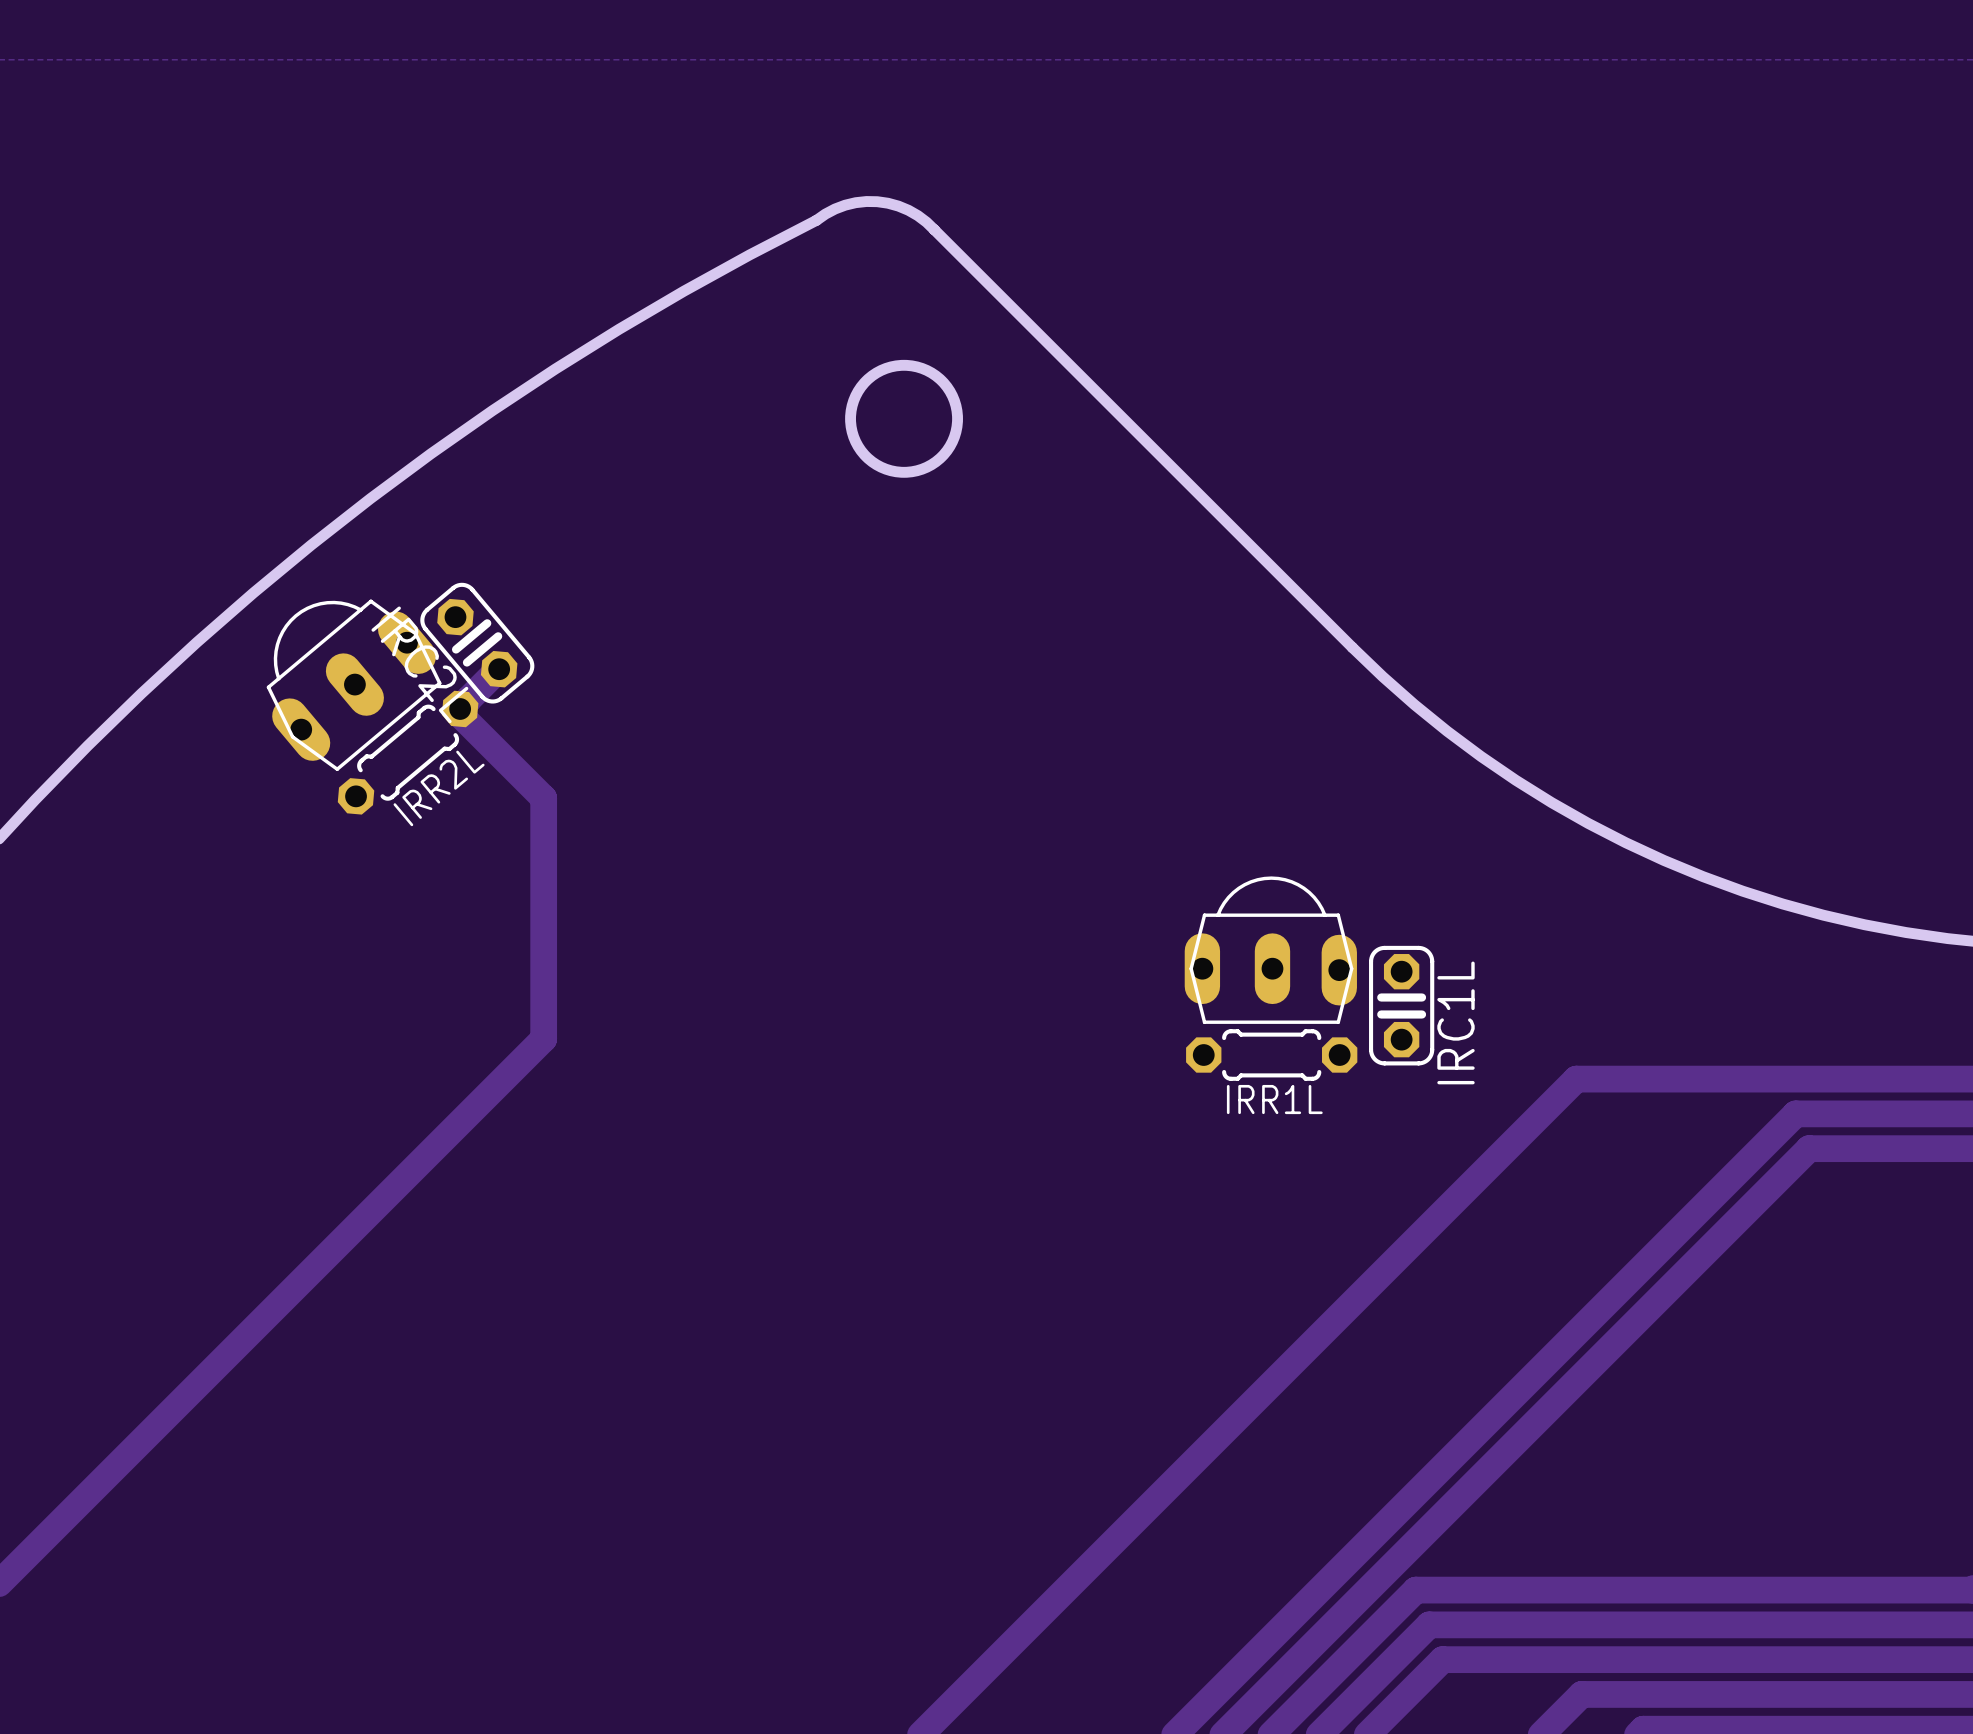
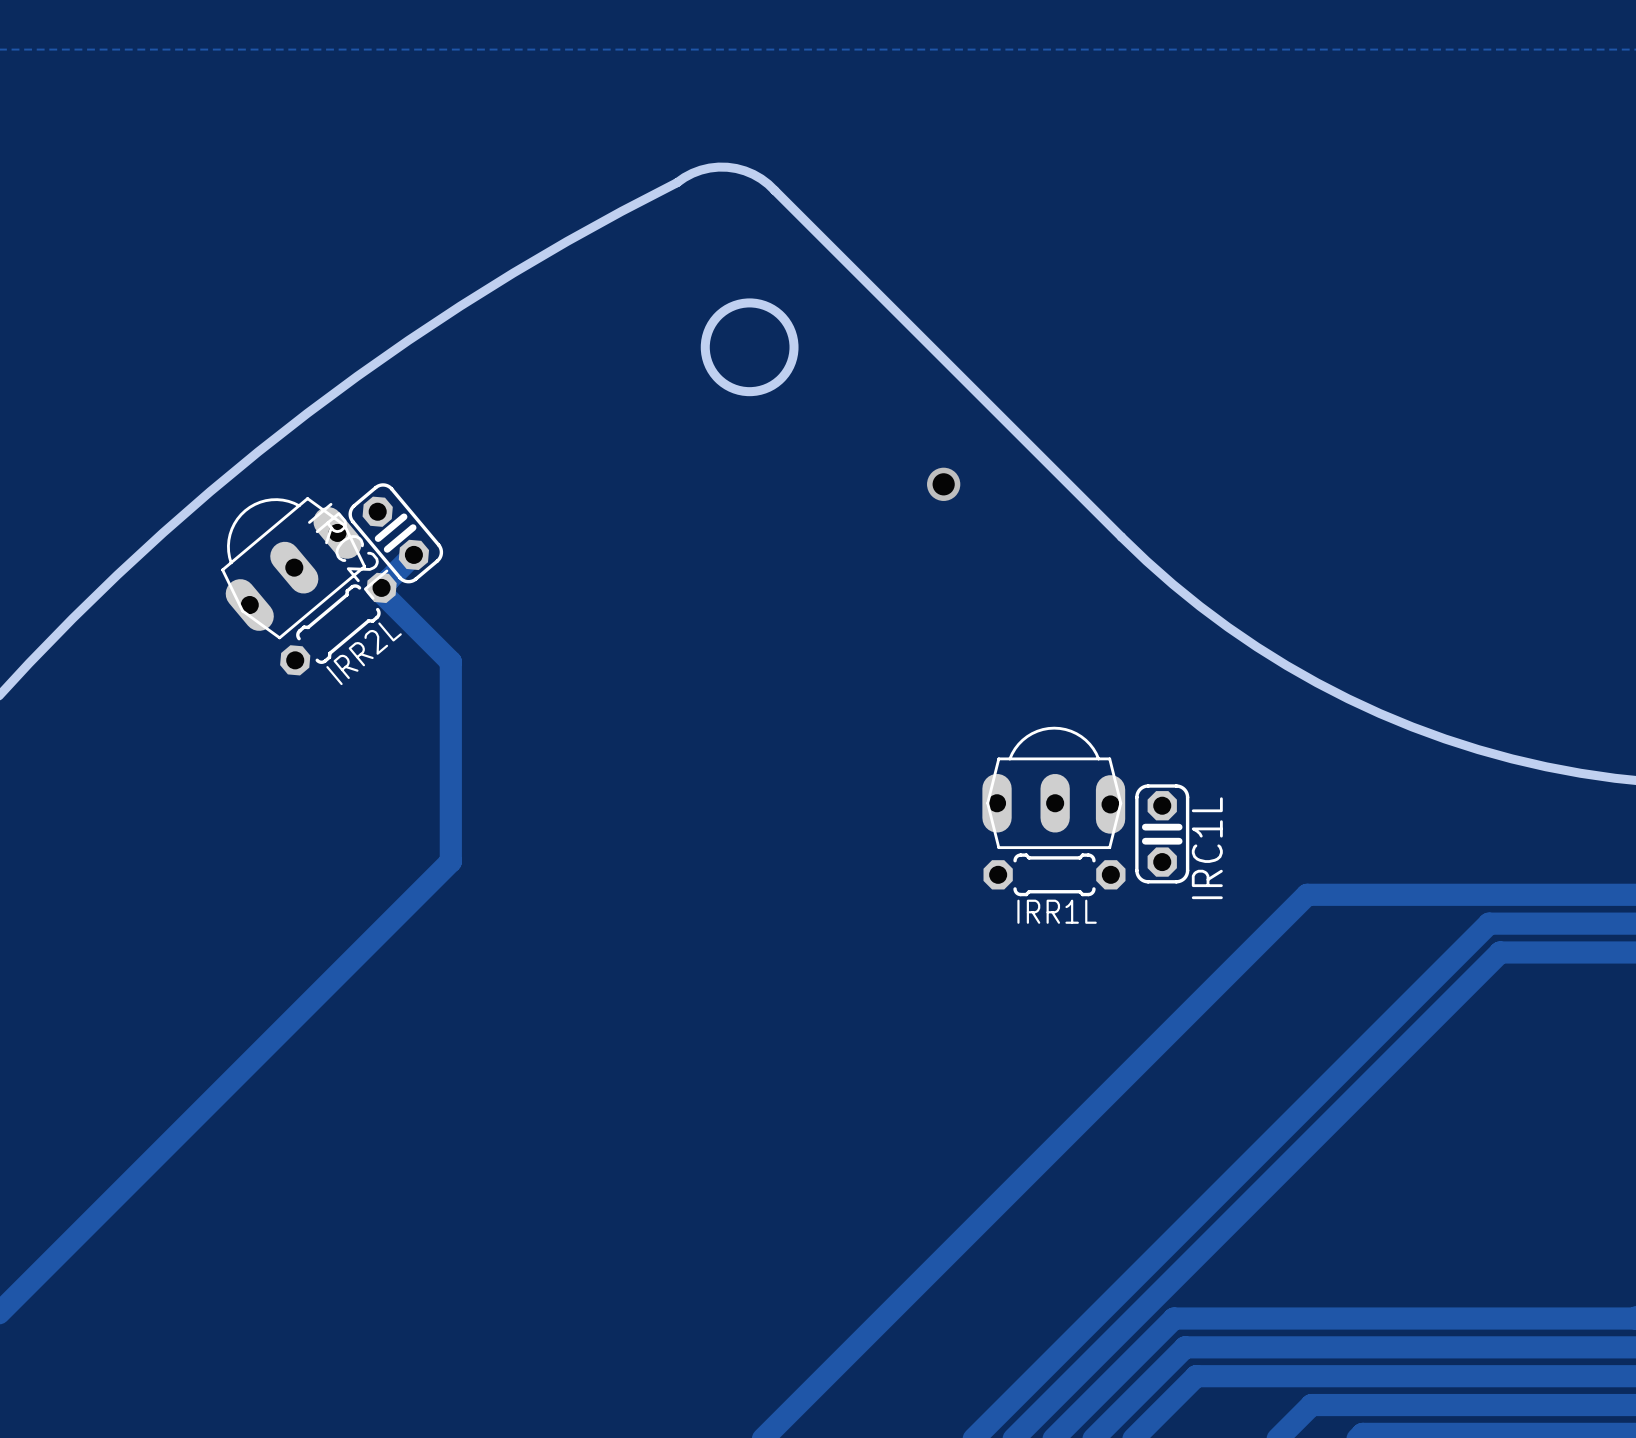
via: none -> (943, 484)

